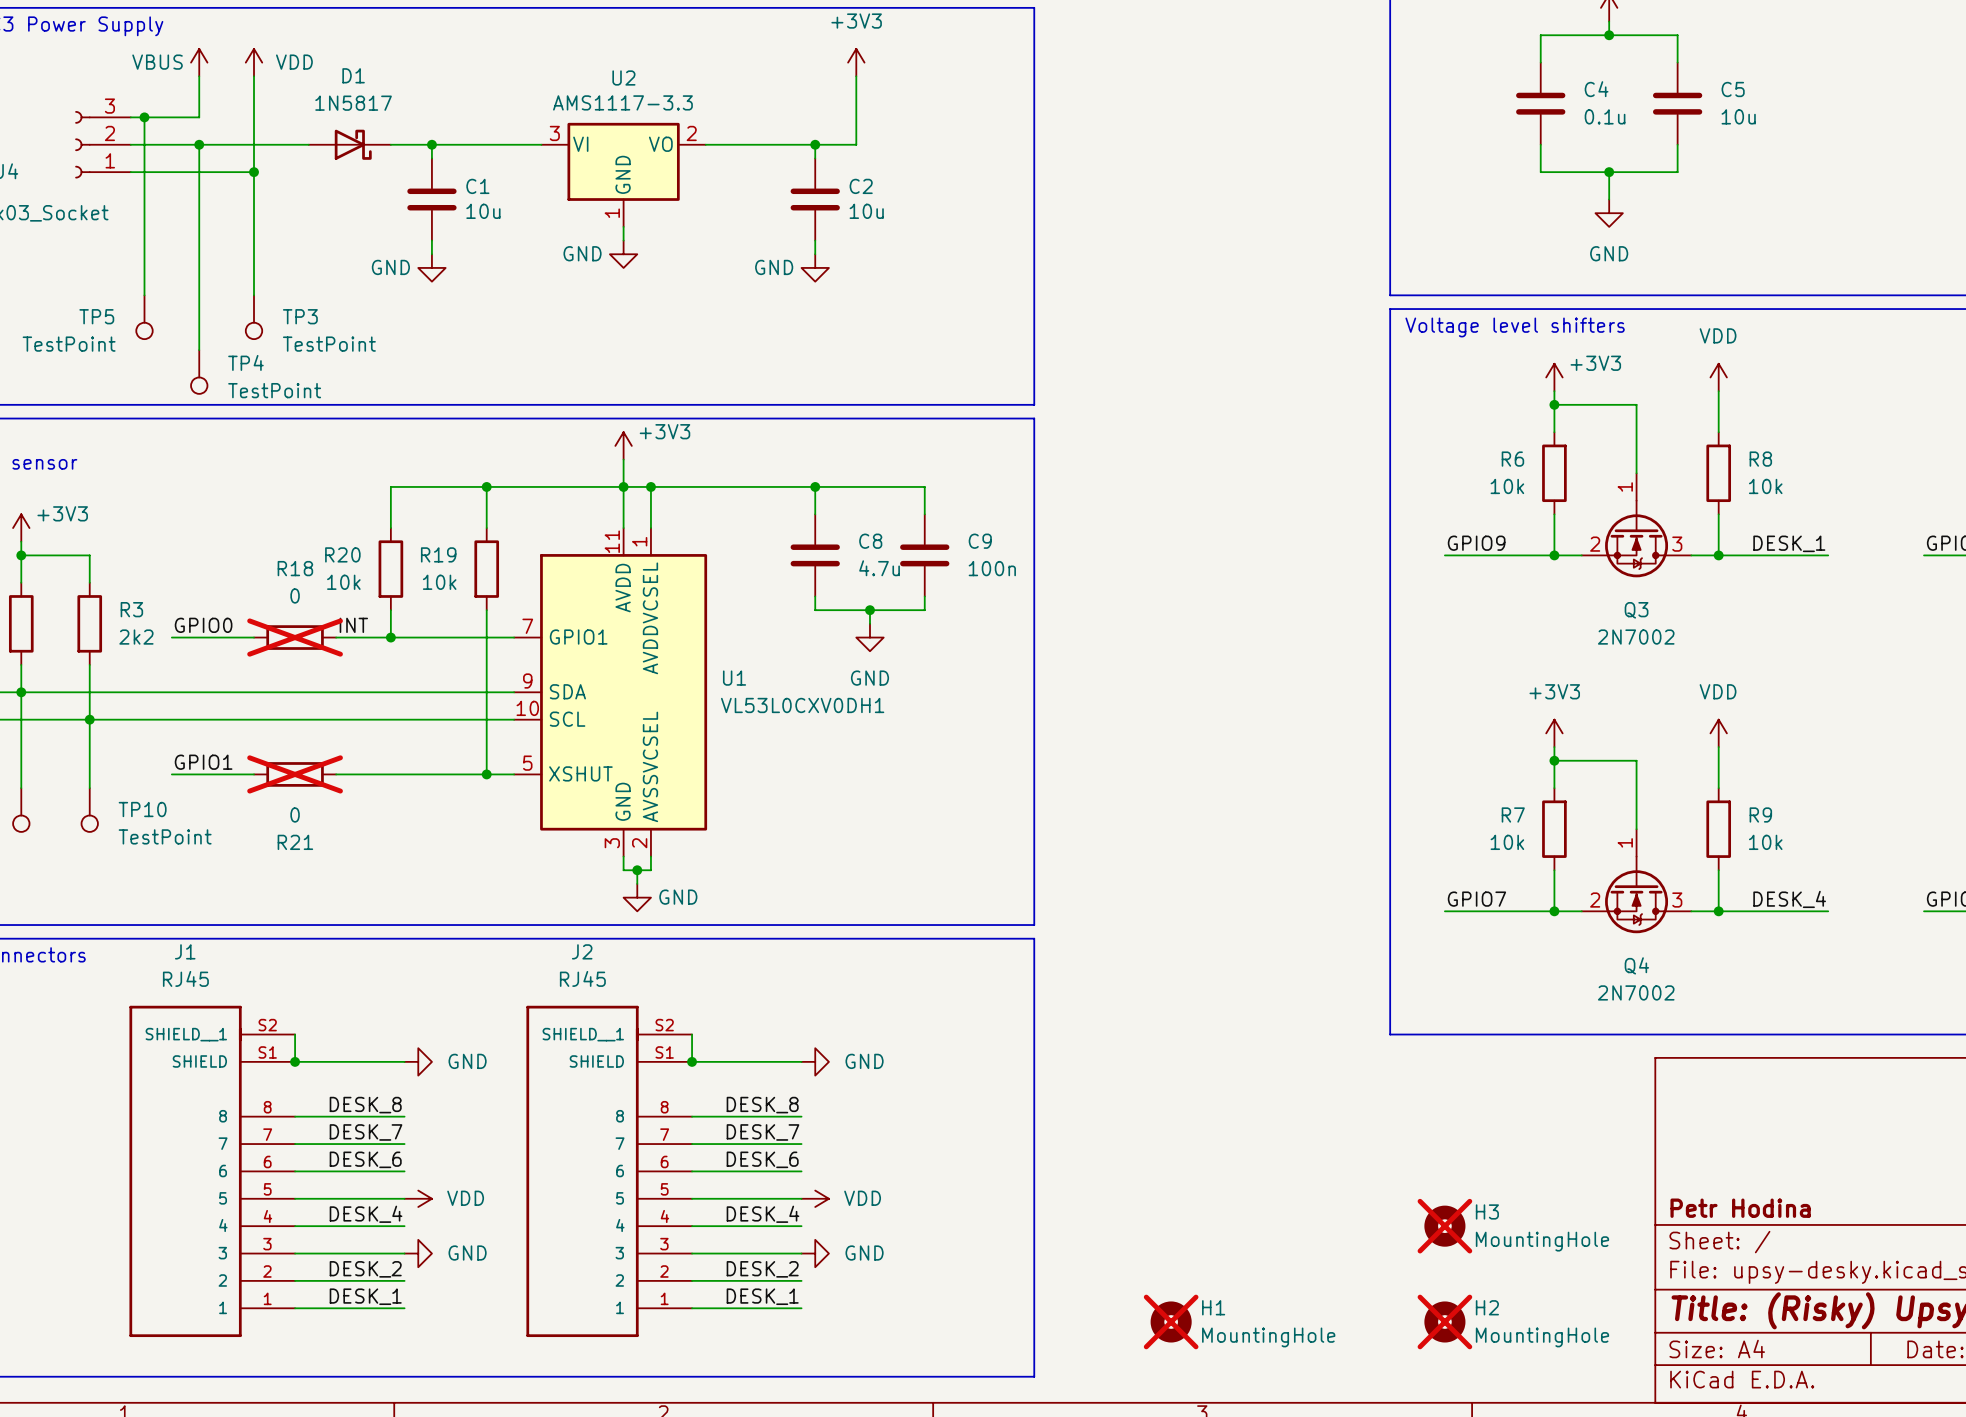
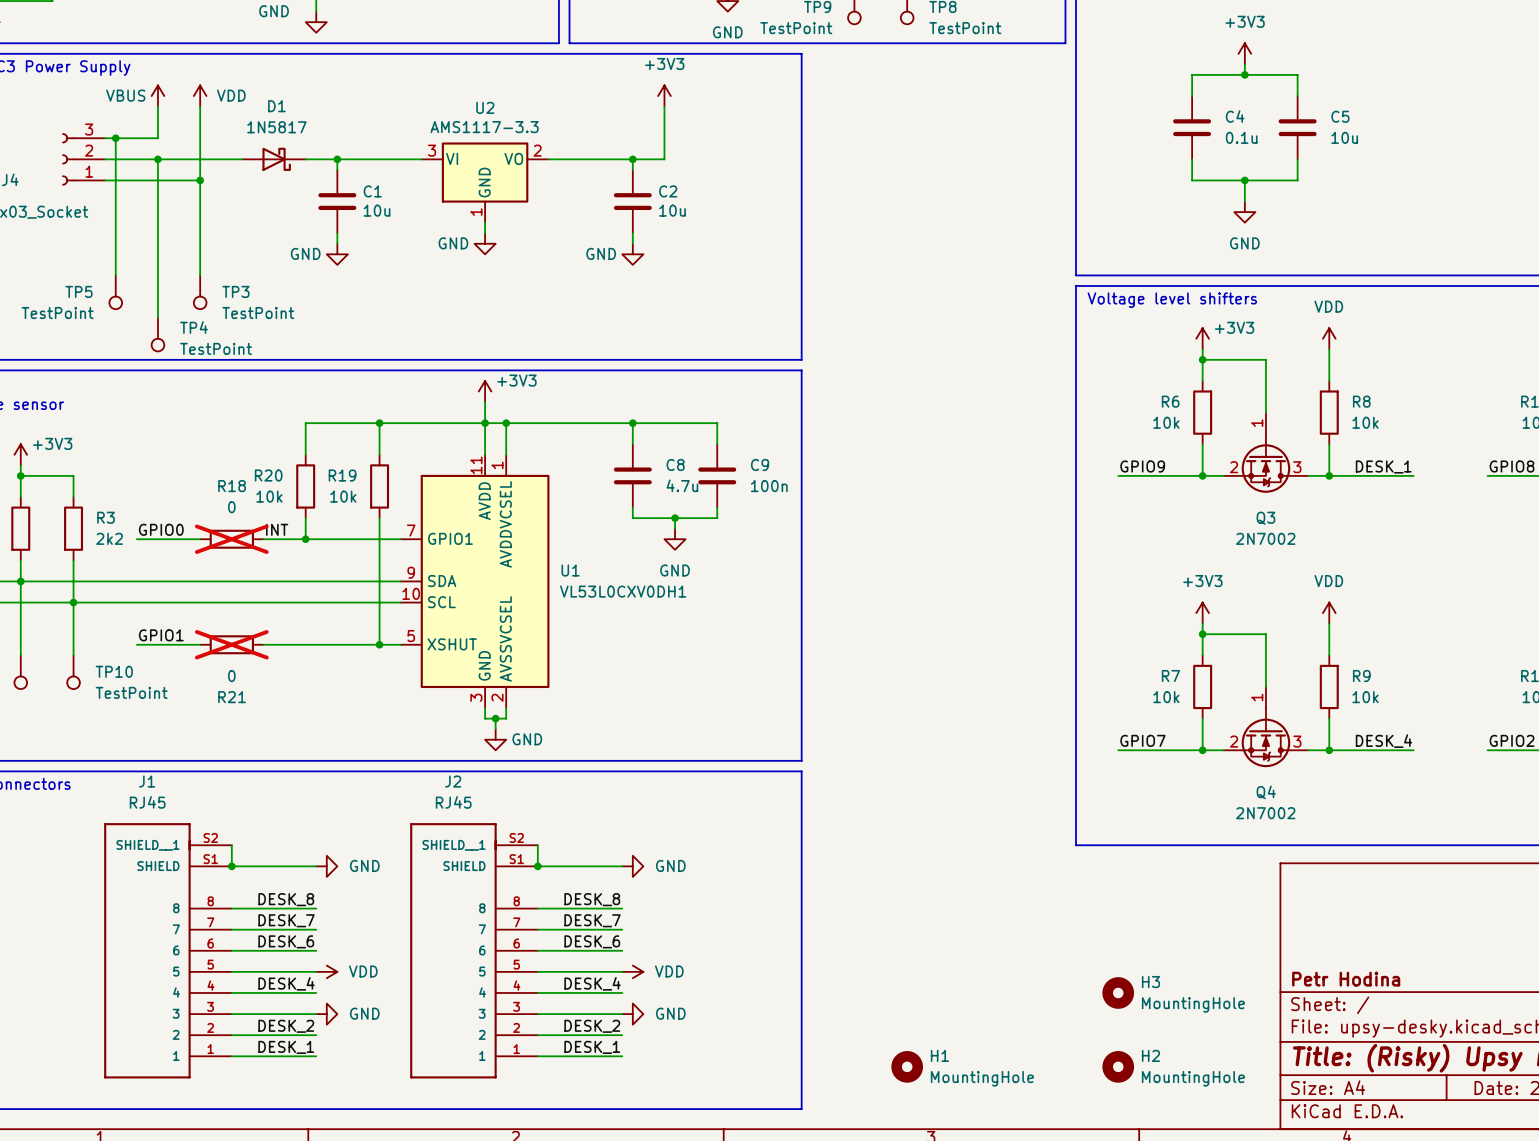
H3 do-not-place cross: (1444, 1226) -> none
H1 do-not-place cross: (1171, 1321) -> none
H2 do-not-place cross: (1444, 1321) -> none

